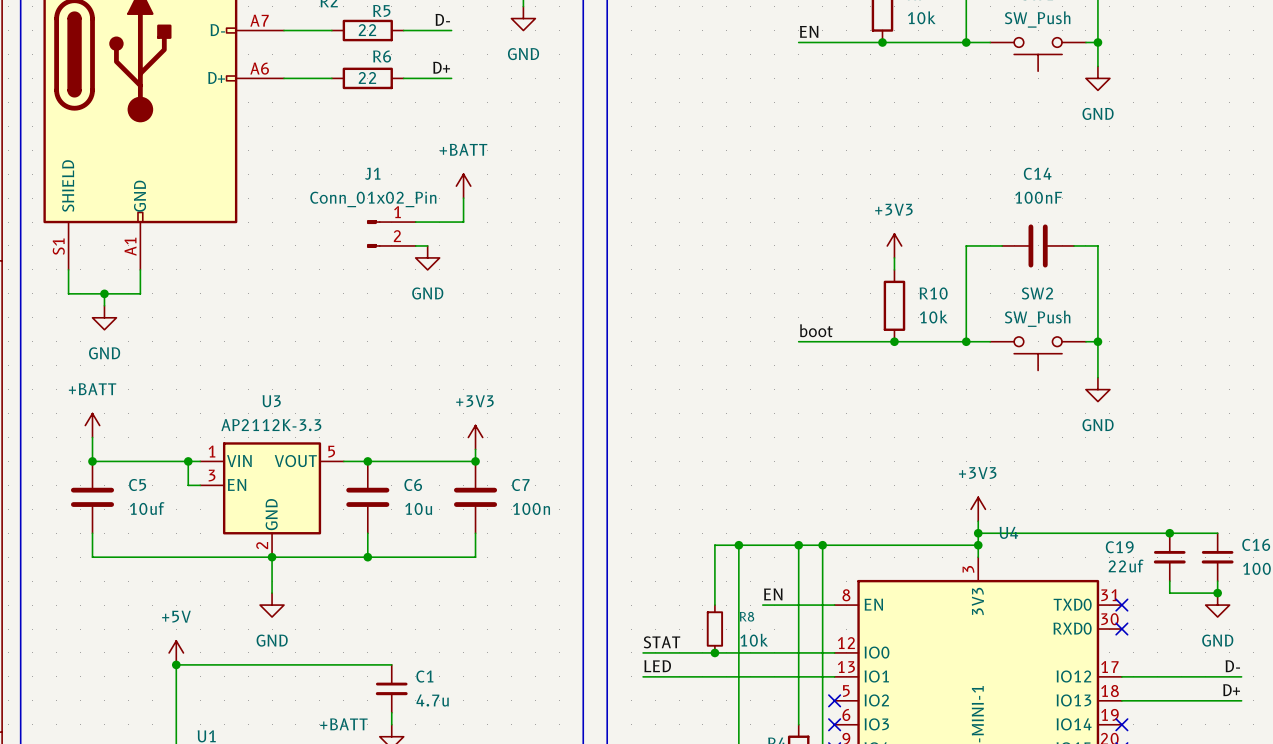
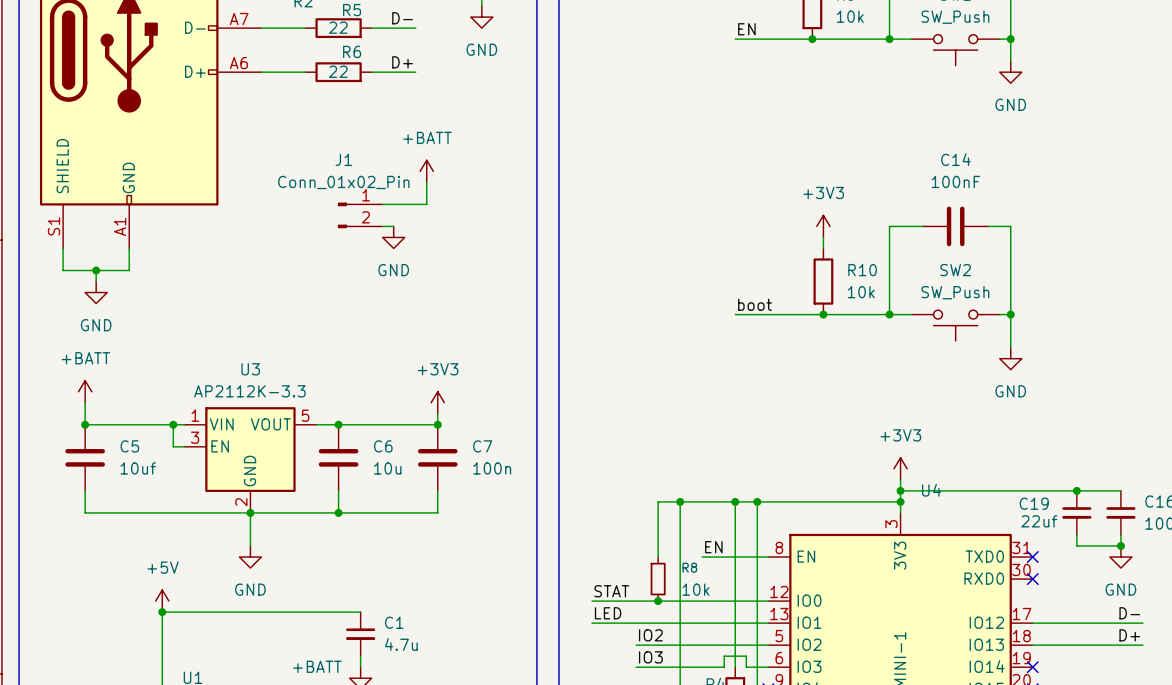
label: none -> IO2 (650, 635)
wire: none -> (636, 645) (768, 645)
no-connect mark: (834, 700) -> none
label: none -> IO3 (650, 657)
wire: none -> (636, 667) (724, 667) (724, 656) (746, 656) (746, 667) (768, 667)
no-connect mark: (834, 724) -> none

